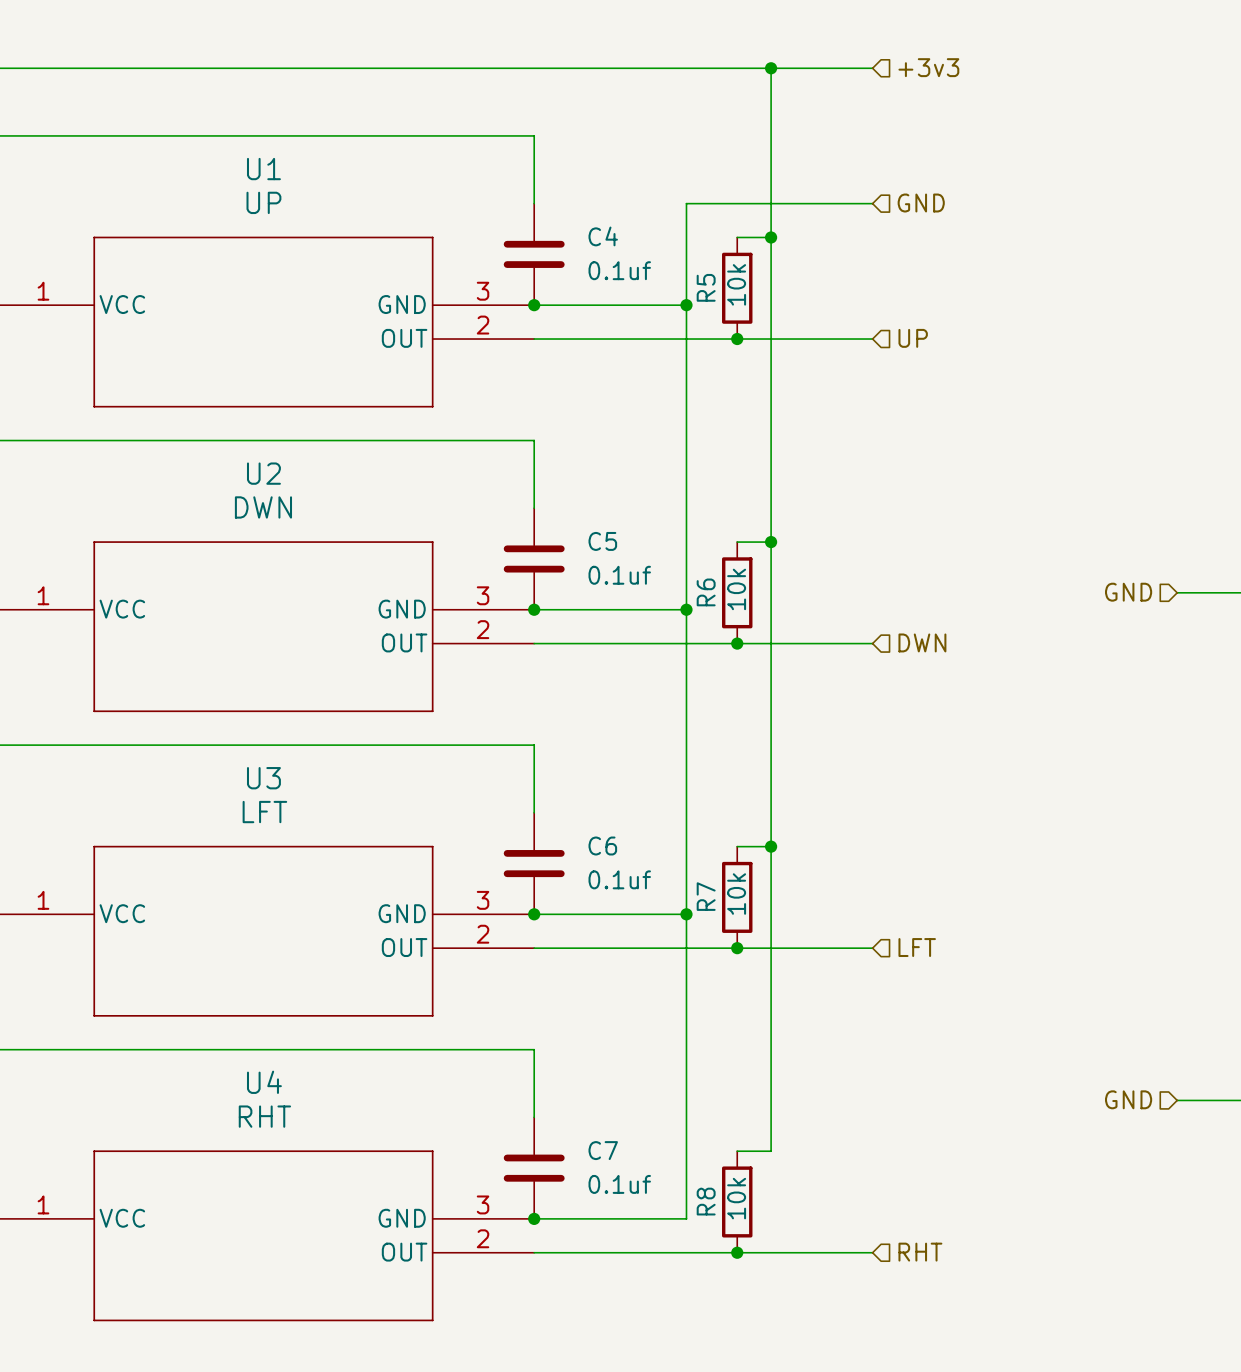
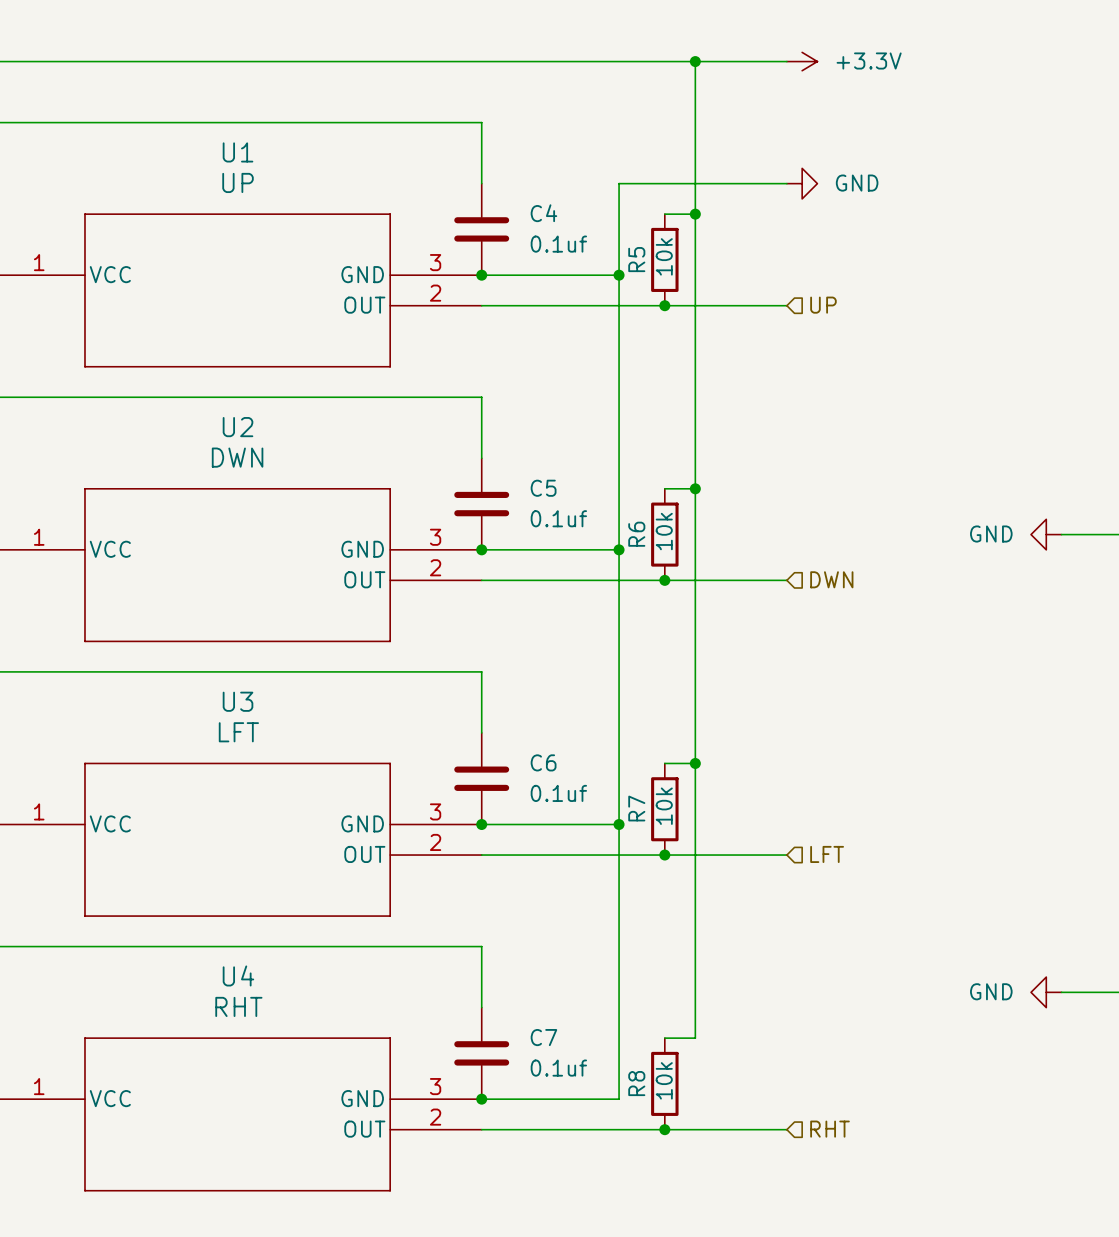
hierarchical label: +3v3 (928, 67) -> none
power symbol: none -> +3.3V (802, 61)
power symbol: none -> GND (802, 183)
hierarchical label: GND (921, 203) -> none
hierarchical label: GND (1128, 592) -> none
power symbol: none -> GND (1046, 534)
hierarchical label: GND (1128, 1099) -> none
power symbol: none -> GND (1046, 992)

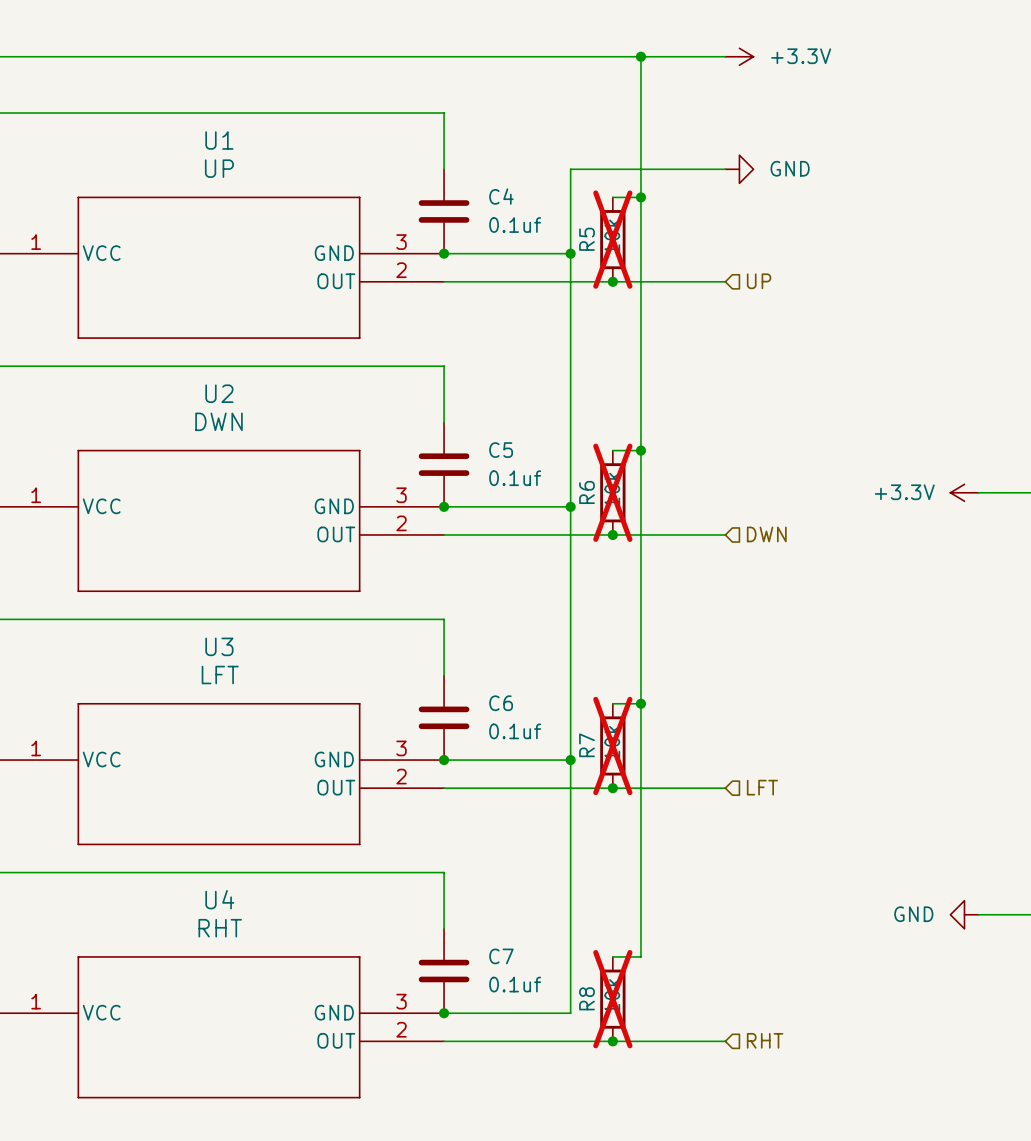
R5 do-not-place cross: none -> (612, 239)
R6 do-not-place cross: none -> (612, 492)
power symbol: GND (1046, 534) -> +3.3V (964, 492)
R7 do-not-place cross: none -> (612, 745)
R8 do-not-place cross: none -> (612, 999)

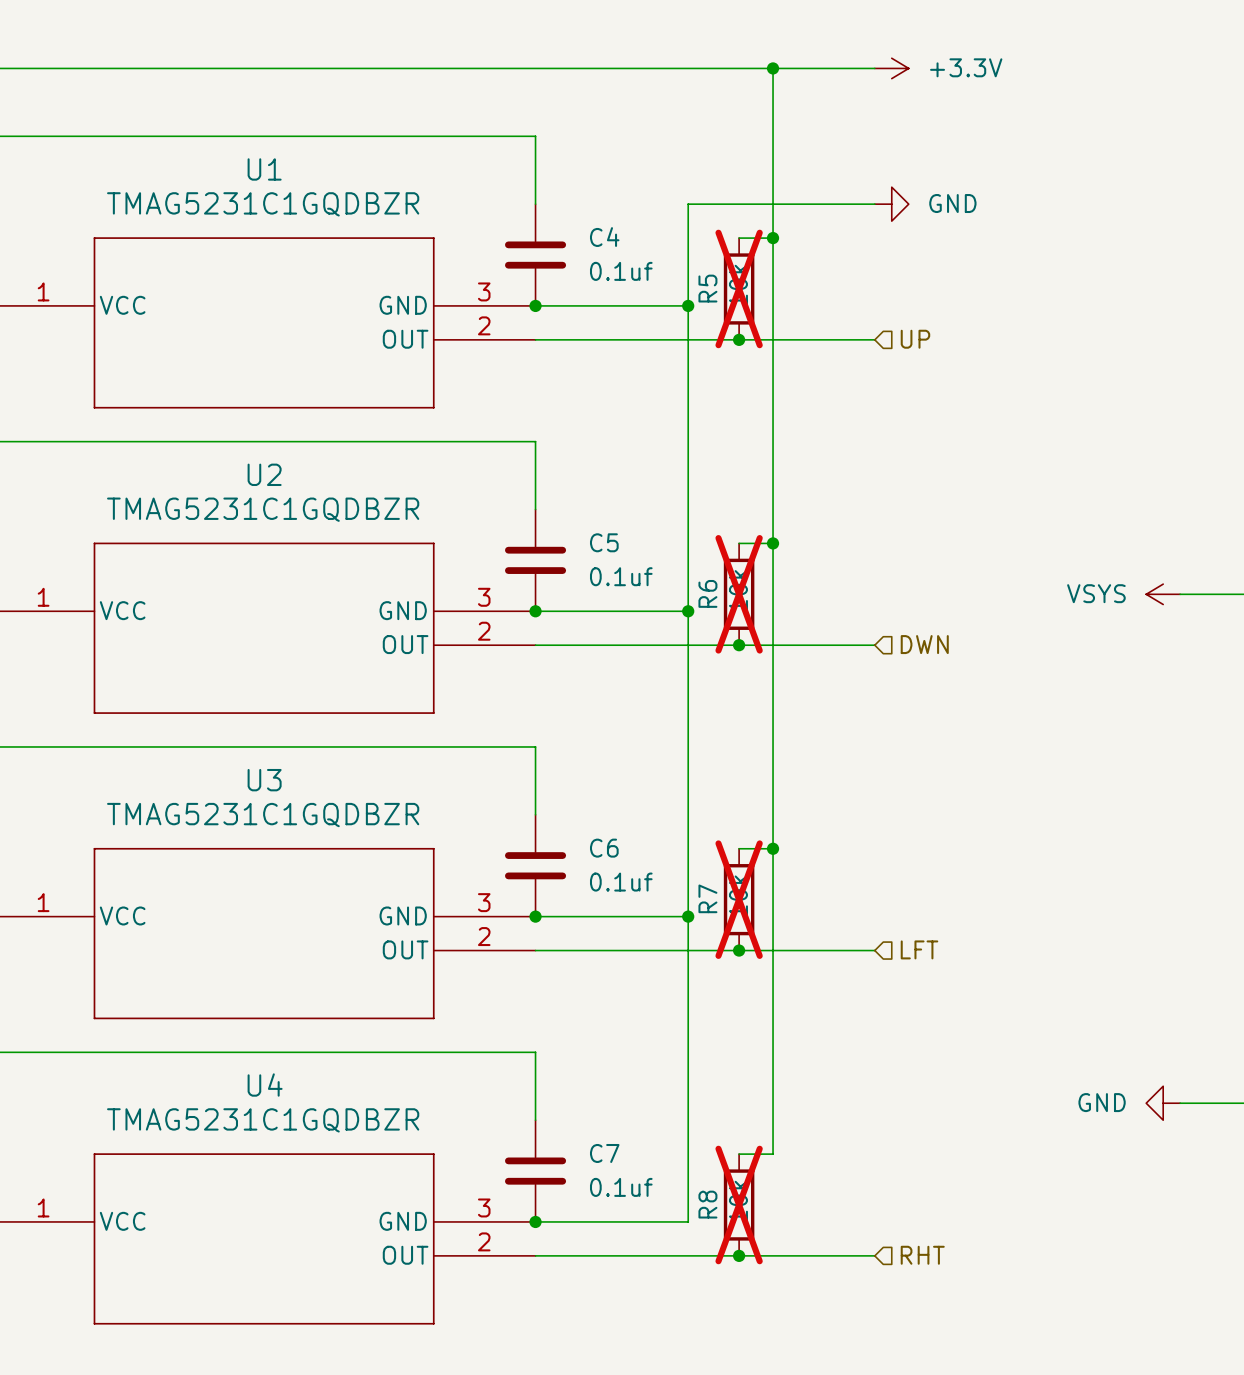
U1 value: UP (219, 168) -> TMAG5231C1GQDBZR (263, 204)
U2 value: DWN (219, 421) -> TMAG5231C1GQDBZR (263, 509)
power symbol: +3.3V (964, 492) -> VSYS (1163, 594)
U3 value: LFT (220, 675) -> TMAG5231C1GQDBZR (263, 815)
U4 value: RHT (220, 928) -> TMAG5231C1GQDBZR (263, 1120)

